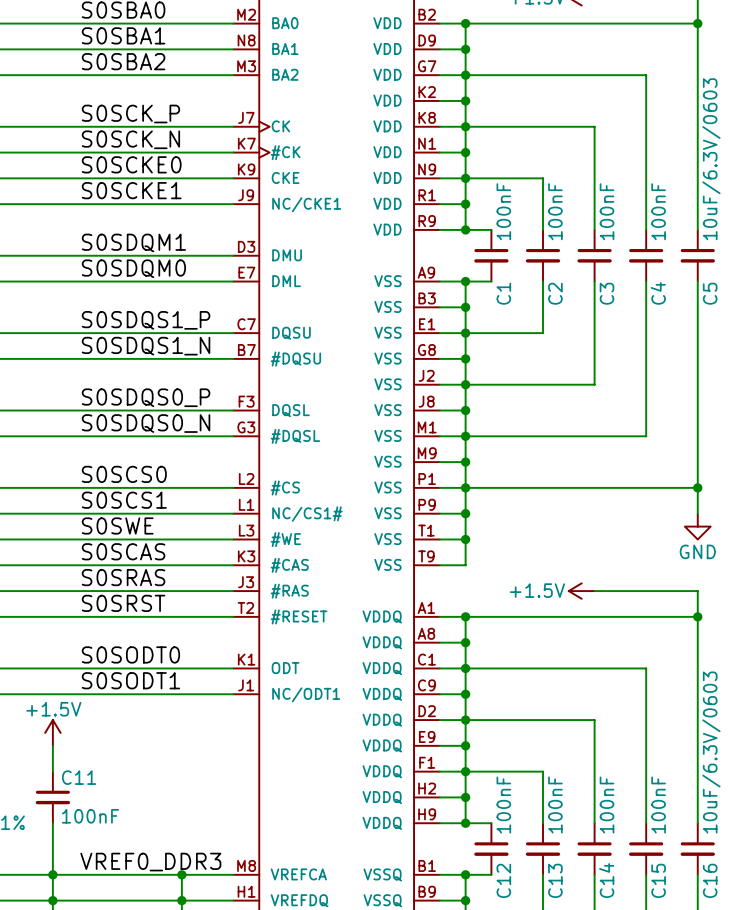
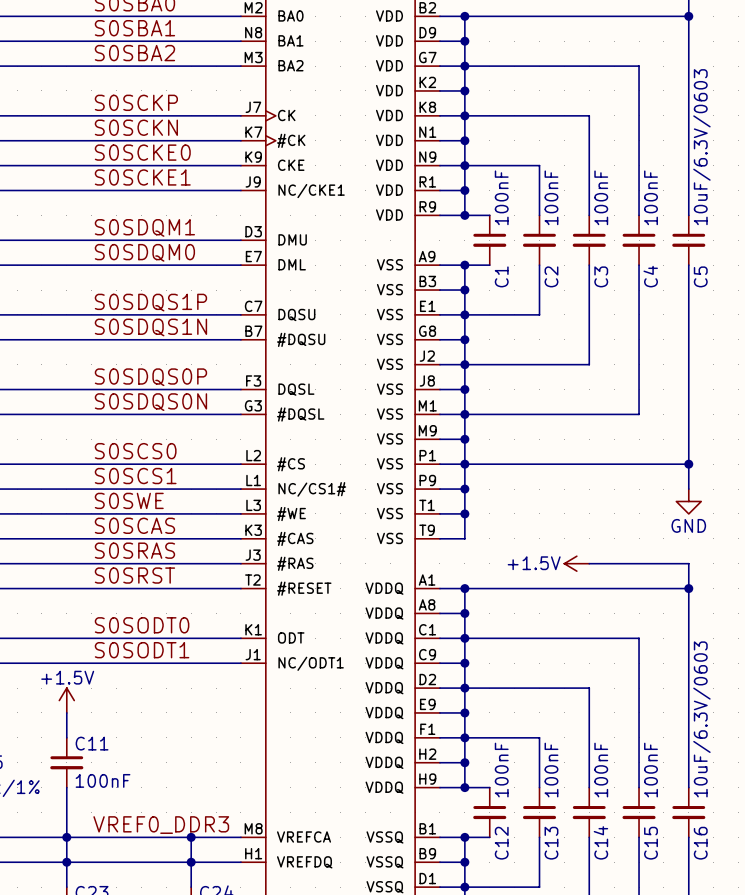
label: S0SCK_P (130, 114) -> S0SCKP (136, 102)
label: S0SCK_N (130, 139) -> S0SCKN (136, 127)
label: S0SDQS1_P (146, 320) -> S0SDQS1P (150, 302)
label: S0SDQS1_N (146, 346) -> S0SDQS1N (150, 327)
label: S0SDQS0_P (146, 397) -> S0SDQS0P (150, 377)
label: S0SDQS0_N (146, 423) -> S0SDQS0N (150, 402)

